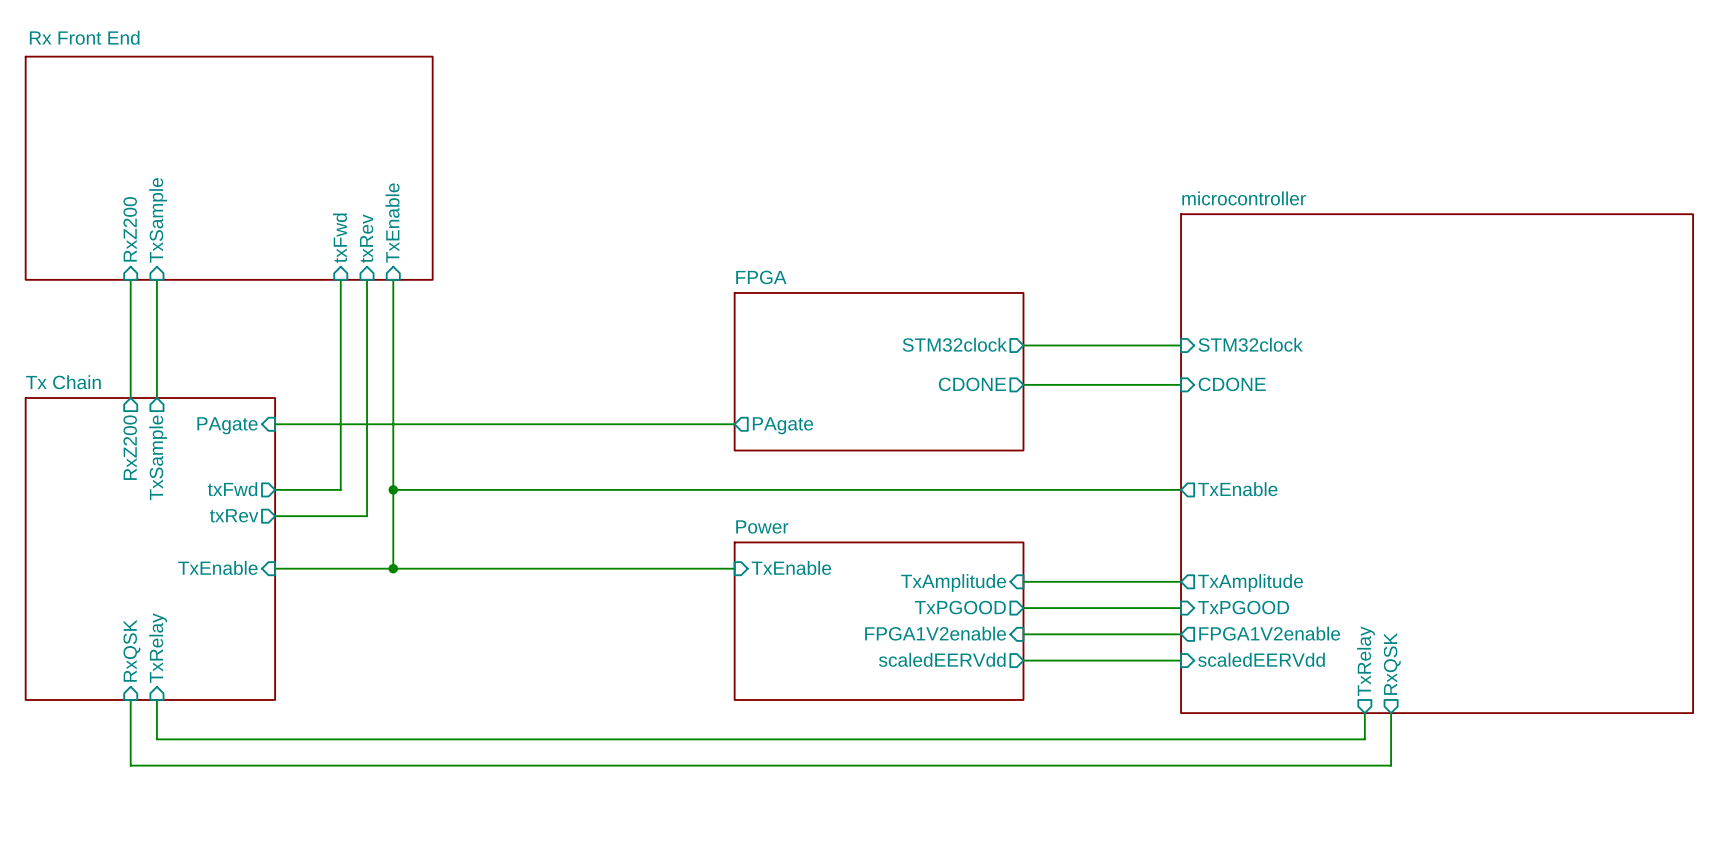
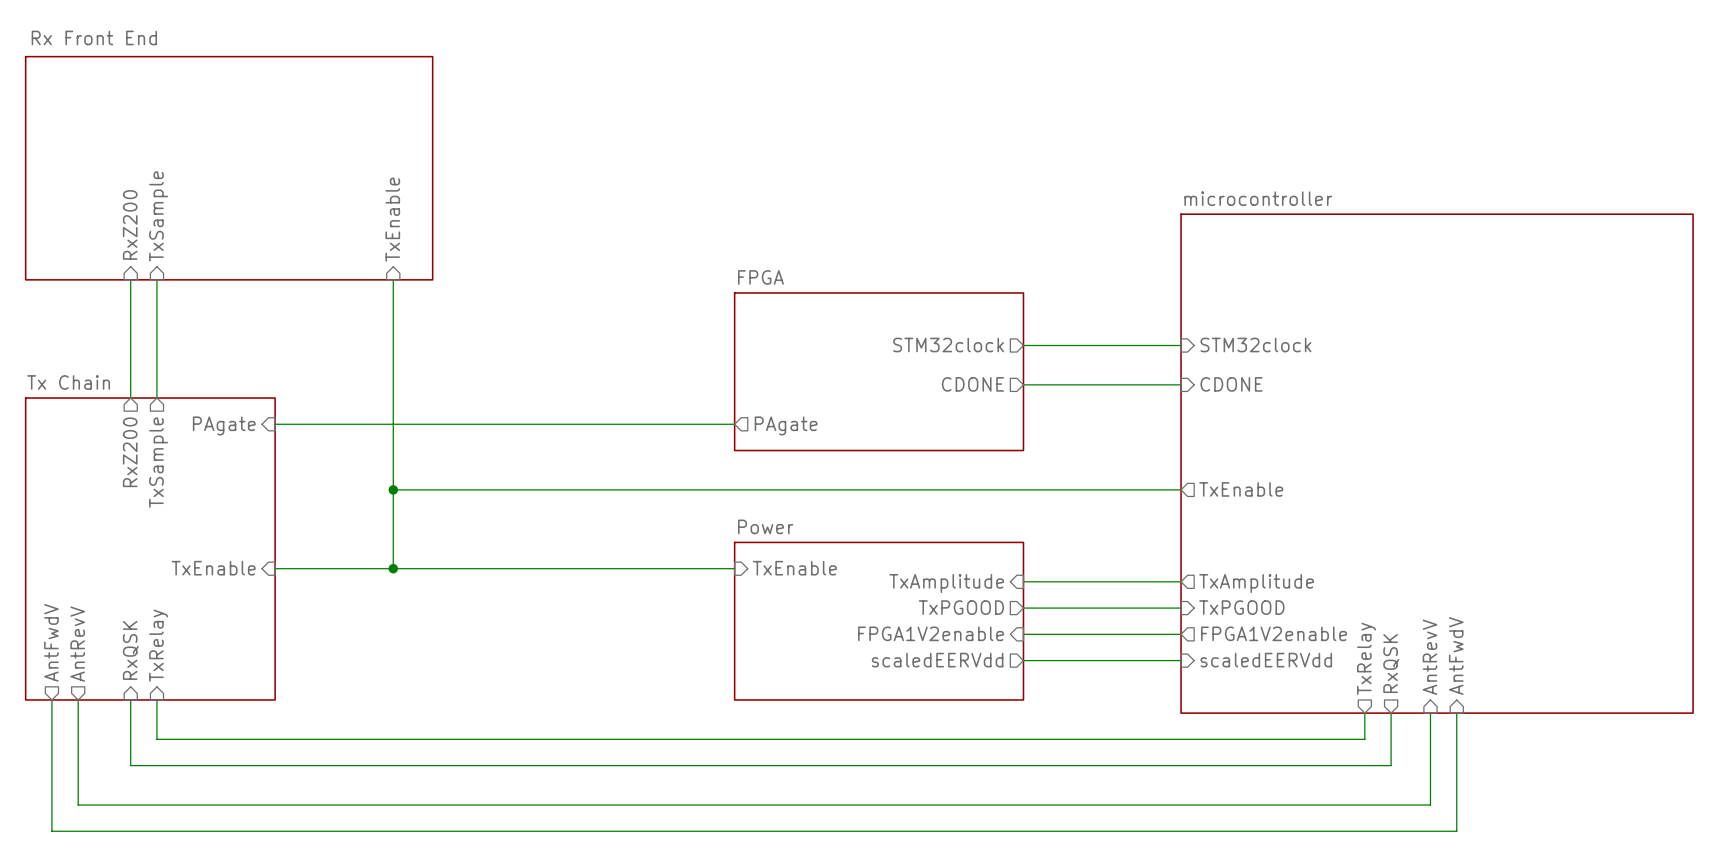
sheet pin: txFwd (340, 238) -> none
sheet pin: txRev (366, 238) -> none
wire: (340, 279) (340, 489) (275, 489) -> none
wire: (367, 279) (367, 516) (275, 516) -> none
sheet pin: txFwd (232, 489) -> none
sheet pin: txRev (234, 515) -> none
sheet pin: none -> AntFwdV (51, 642)
sheet pin: none -> AntRevV (77, 644)
sheet pin: none -> AntFwdV (1456, 656)
sheet pin: none -> AntRevV (1429, 657)
wire: none -> (51, 699) (51, 831) (1456, 831) (1456, 713)
wire: none -> (78, 699) (78, 805) (1430, 805) (1430, 713)

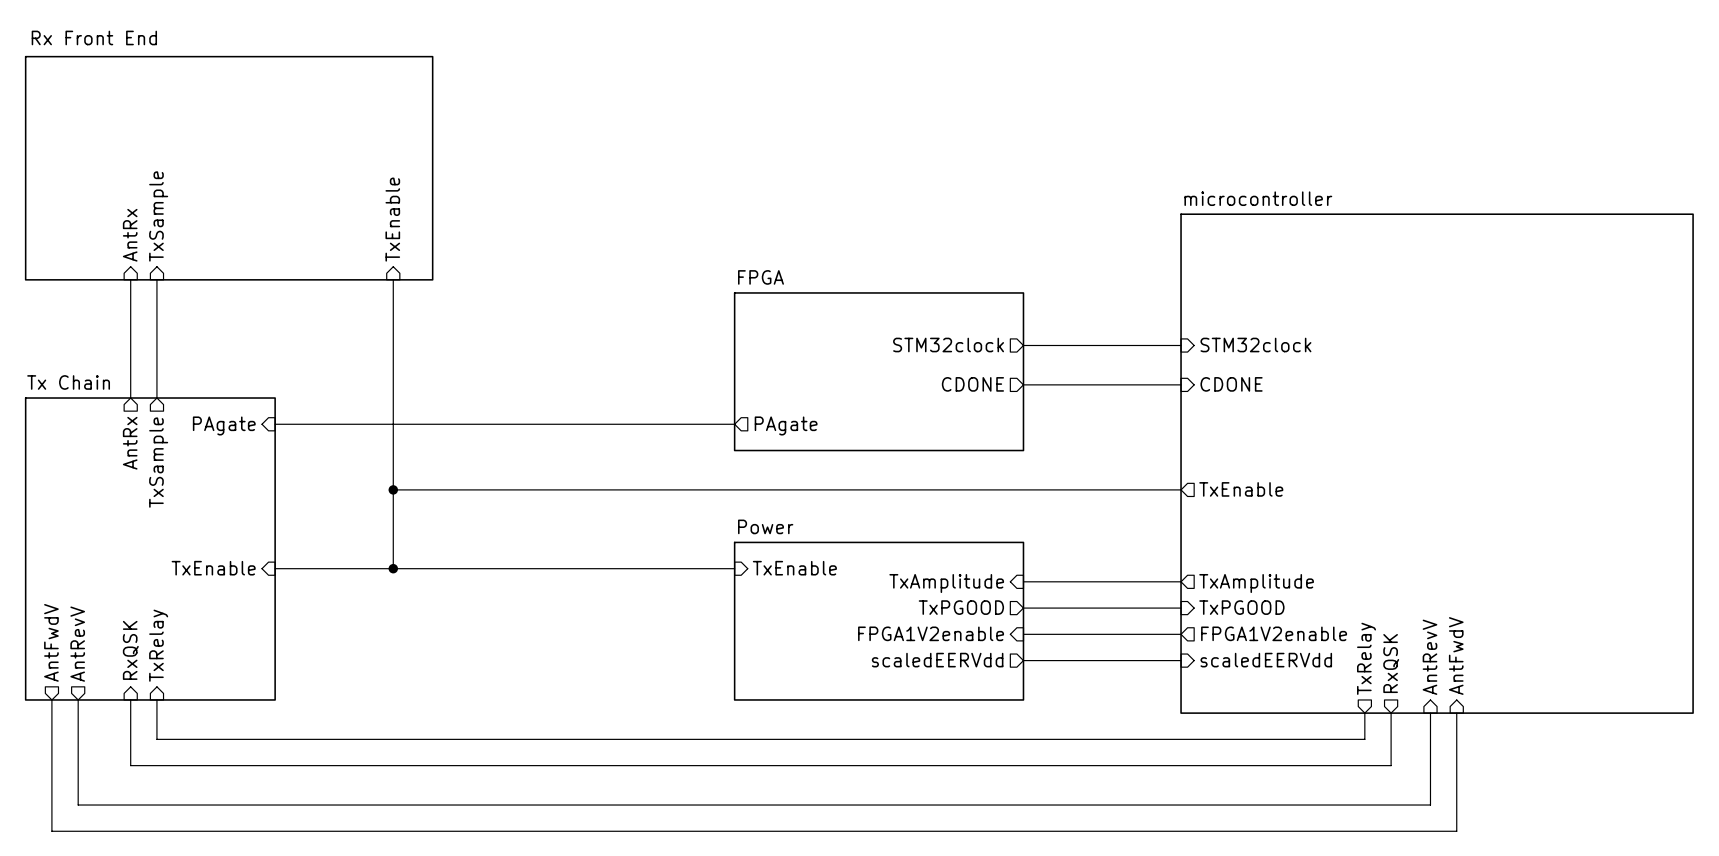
sheet pin: RxZ200 (130, 224) -> AntRx (130, 235)
sheet pin: RxZ200 (130, 452) -> AntRx (130, 443)

